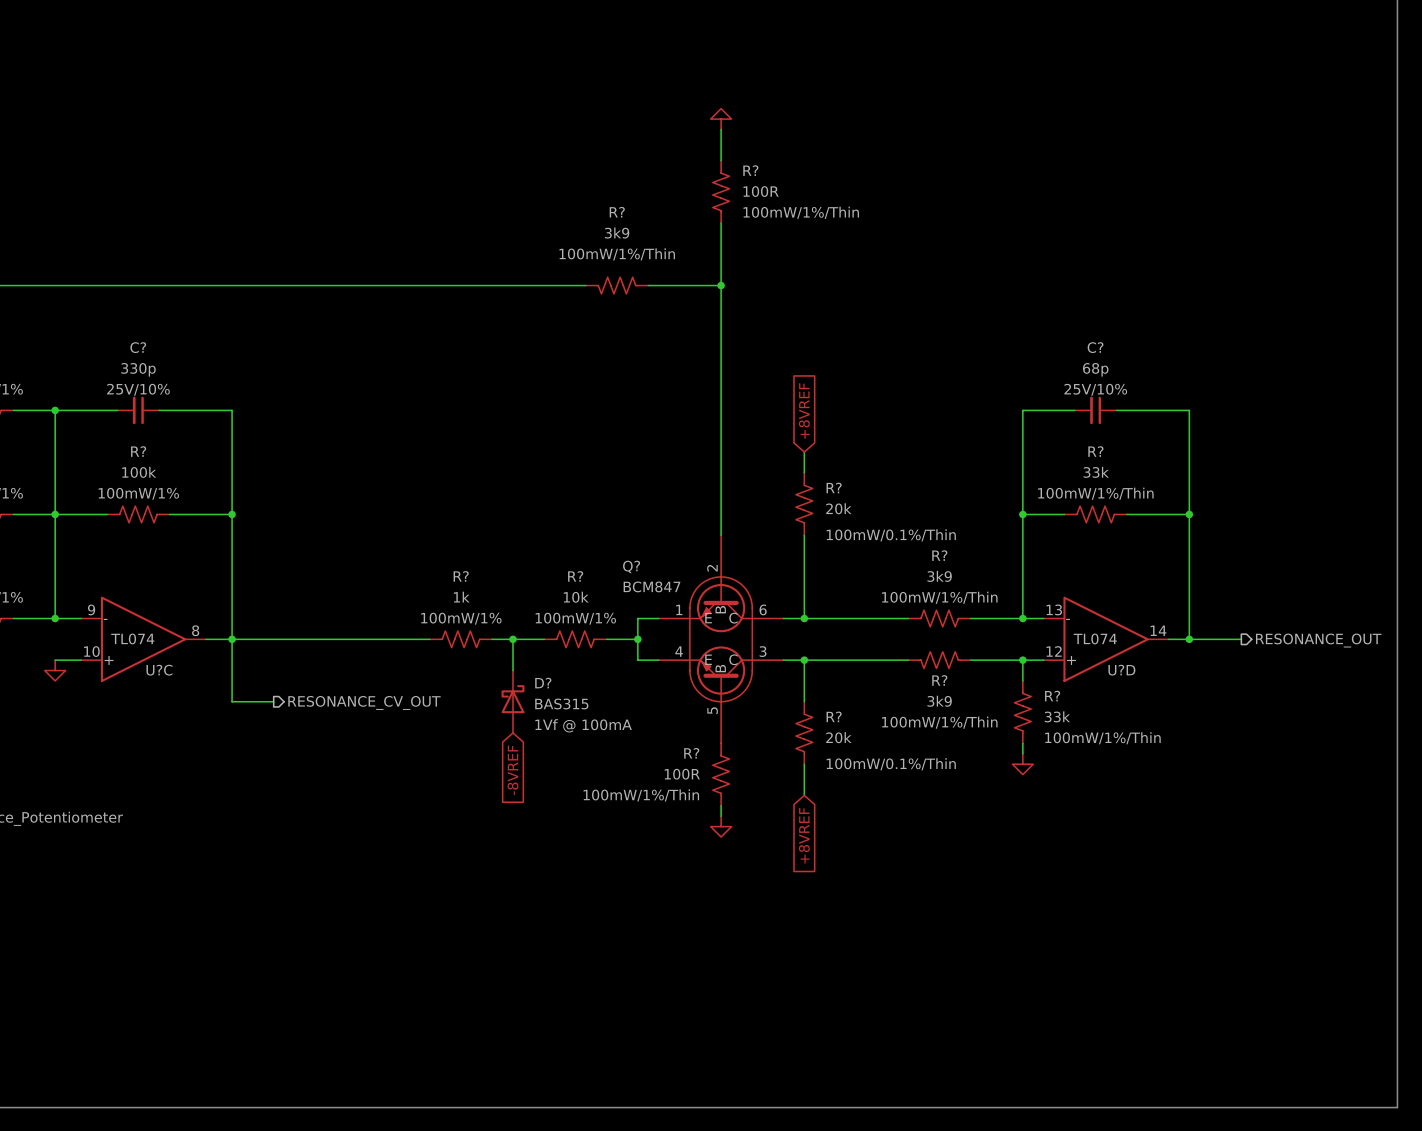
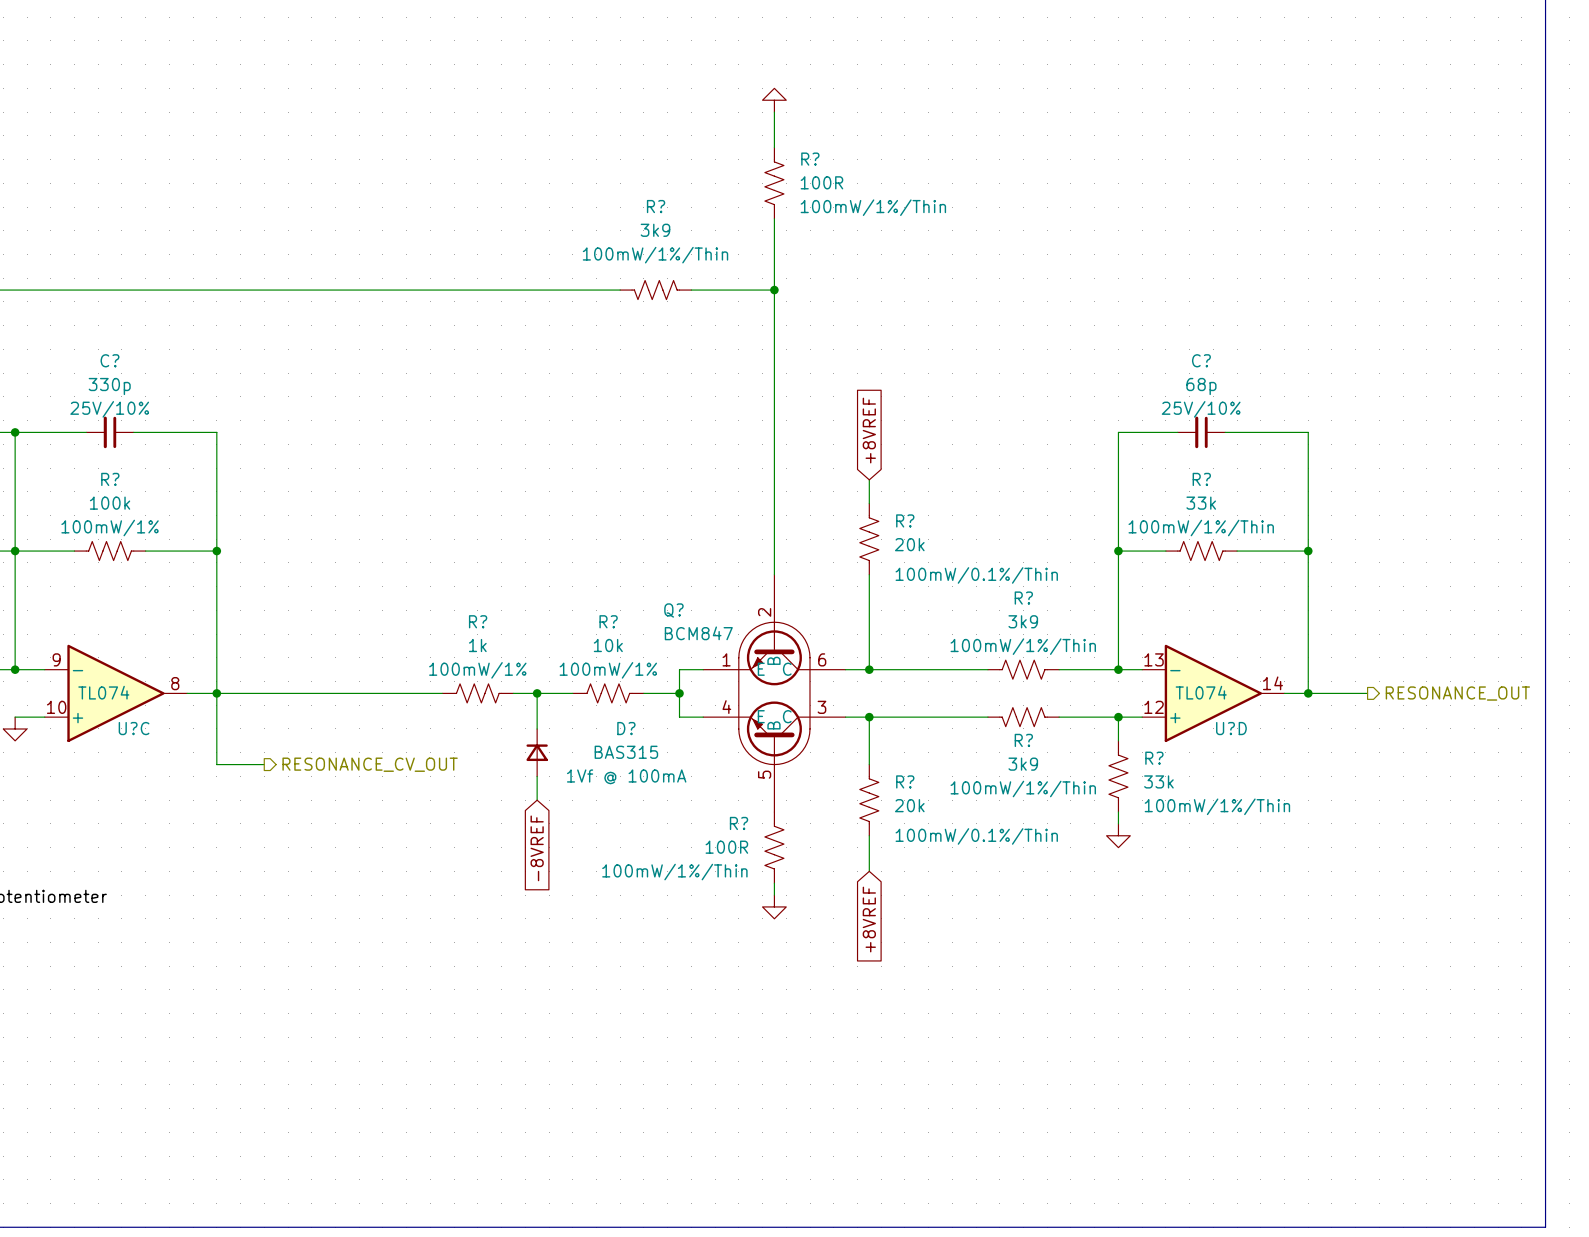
D?: none -> BAS315 (537, 752)
D?: BAS315 (513, 701) -> none

